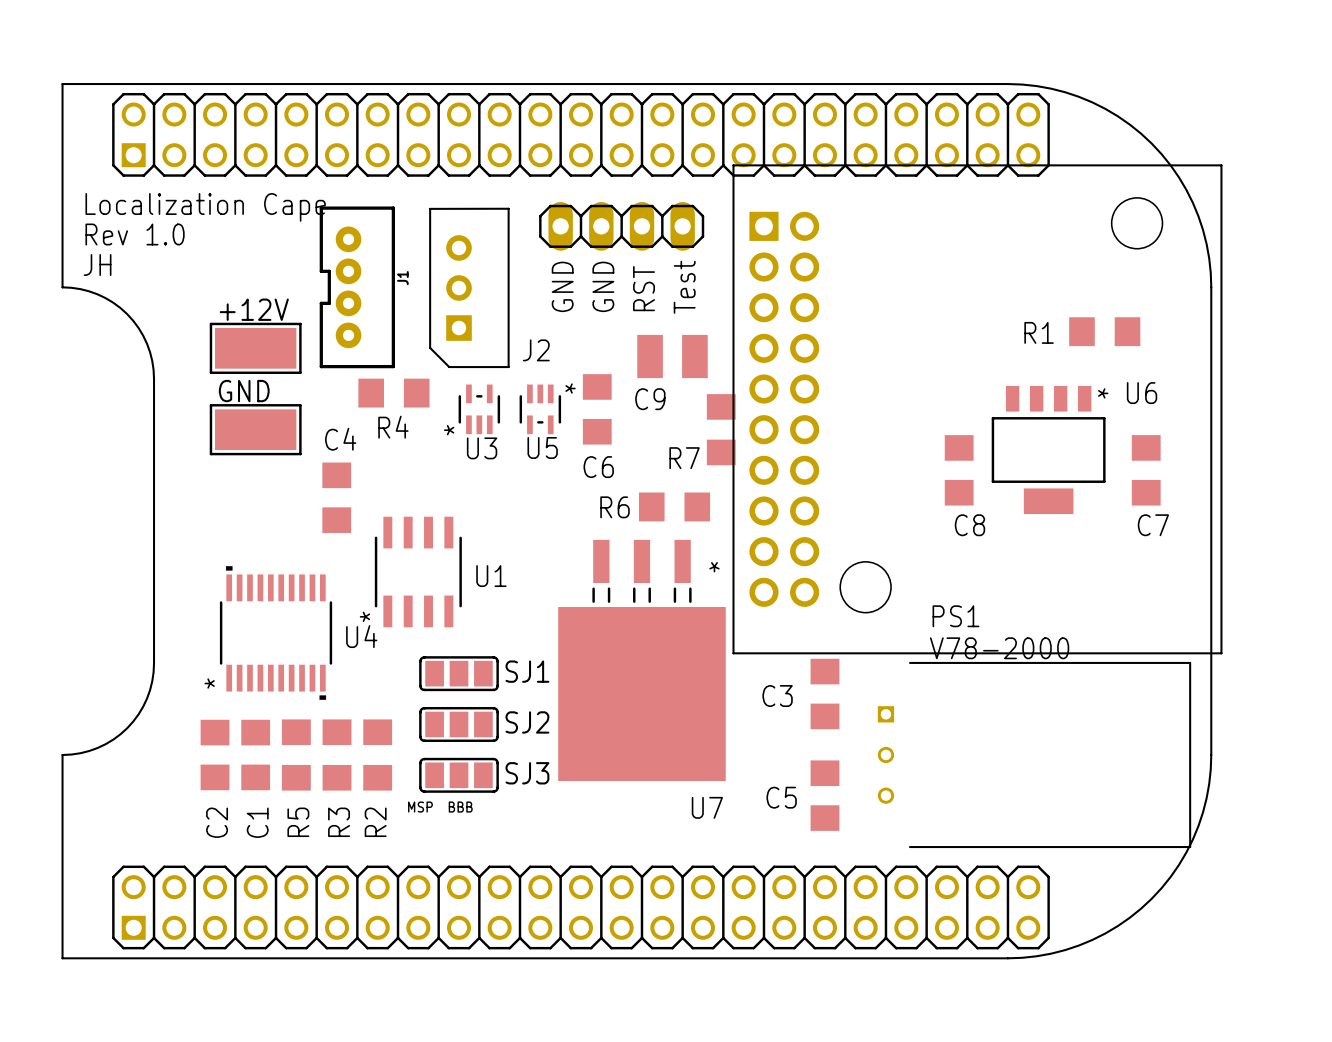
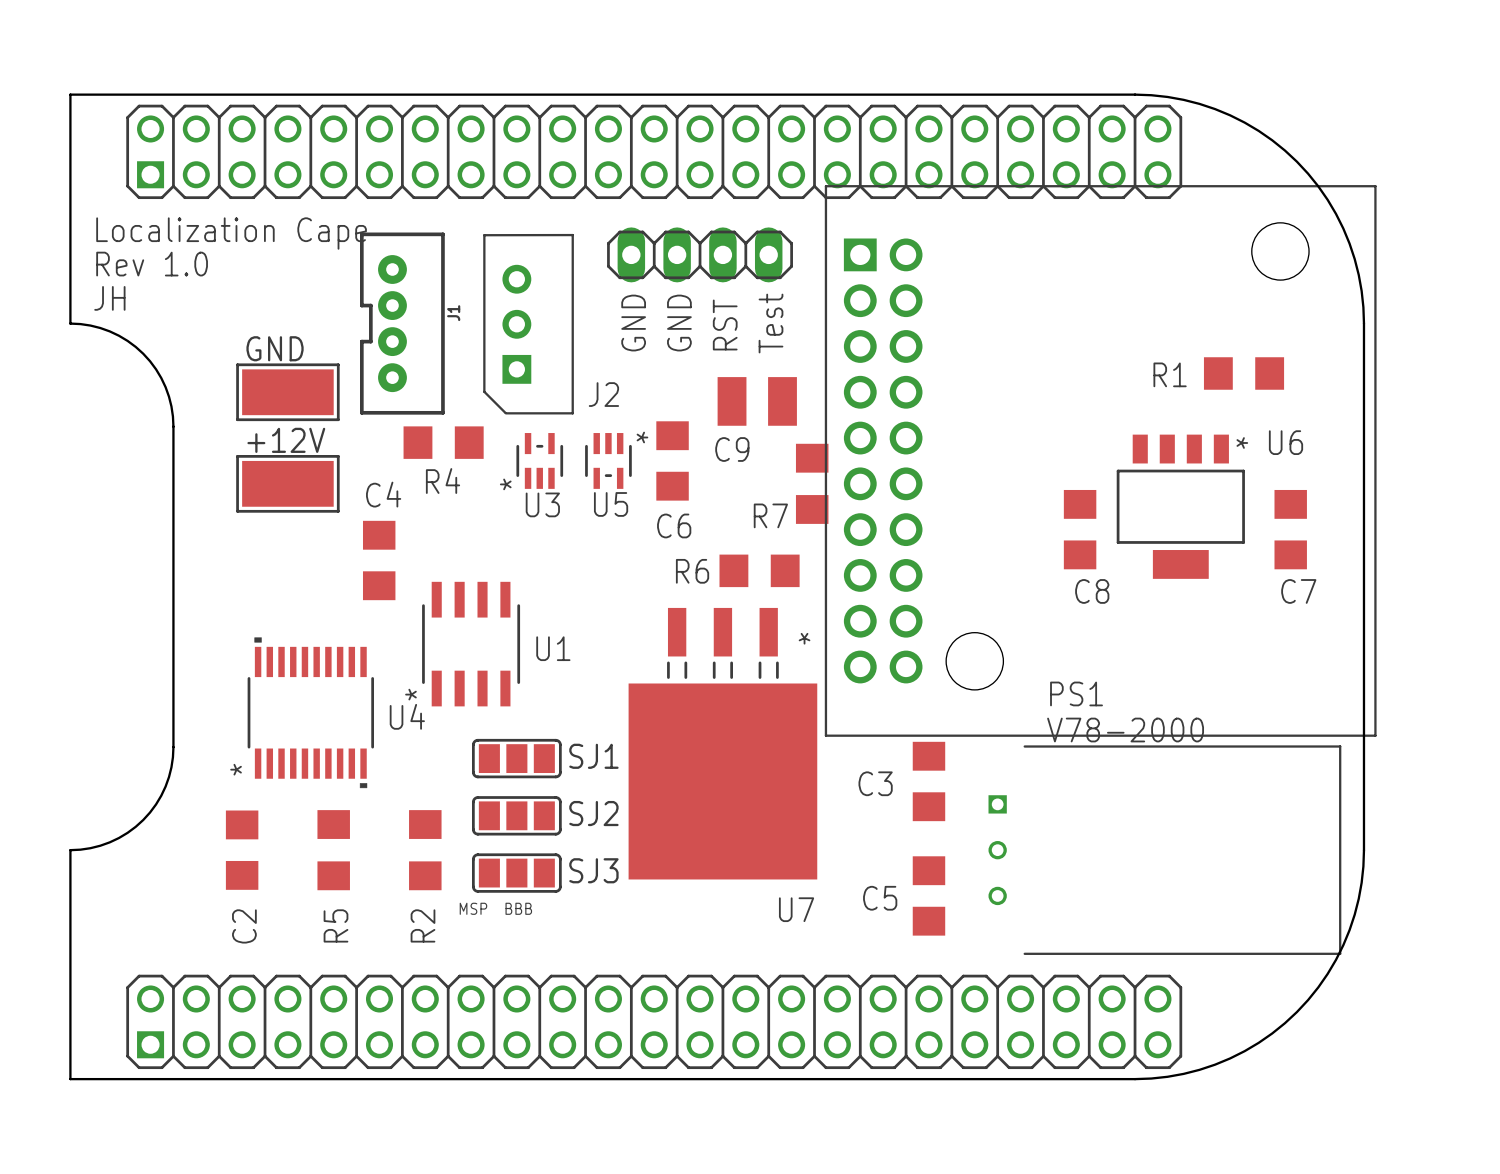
+12V name: +12V (254, 309) -> GND (275, 348)
GND name: GND (244, 391) -> +12V (286, 440)
C1: (255, 754) -> none
R3: (337, 754) -> none

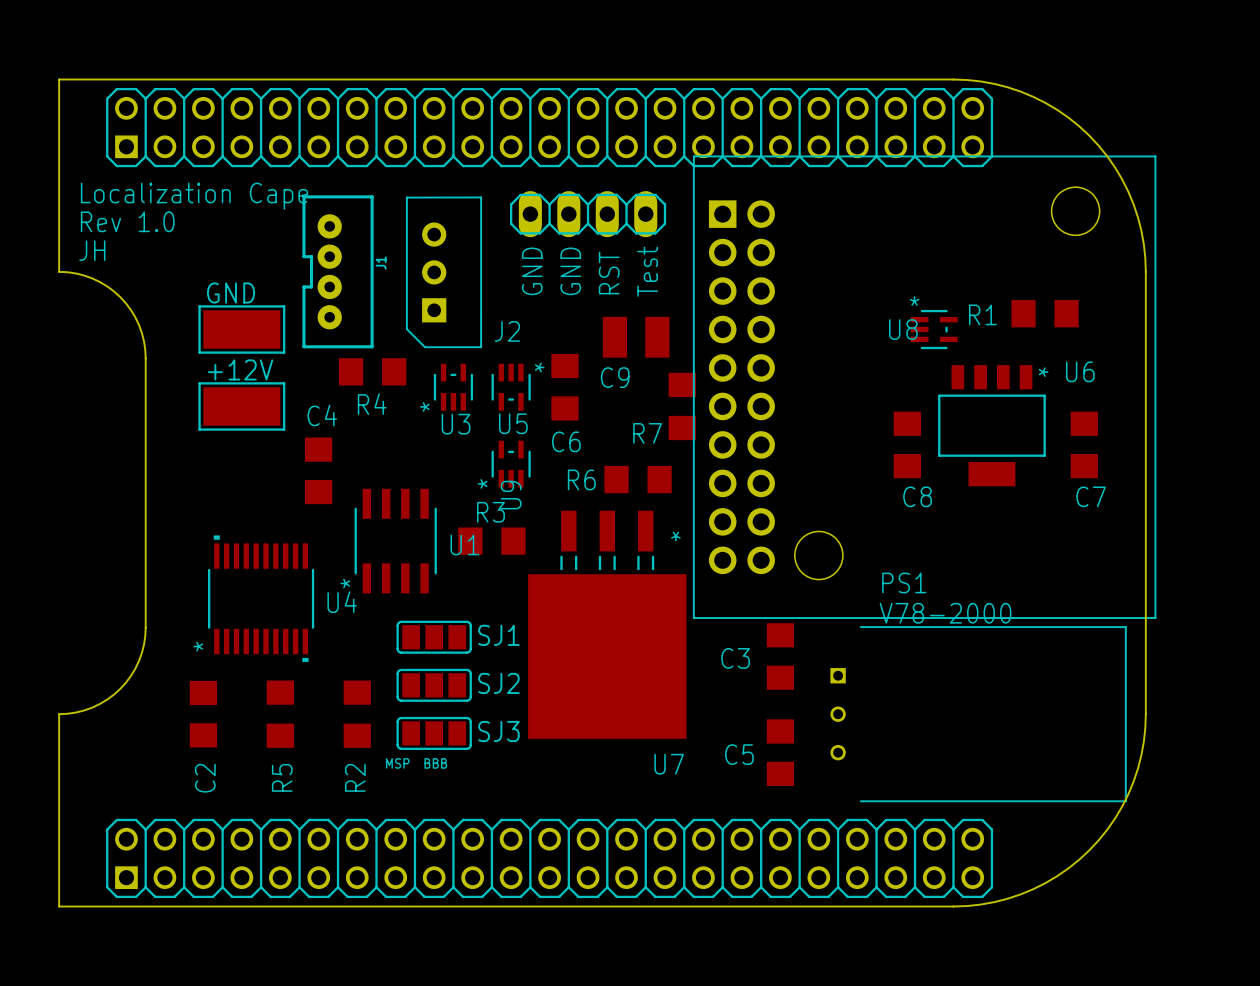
U8: none -> (934, 329)
U9: none -> (511, 464)
R3: none -> (491, 541)

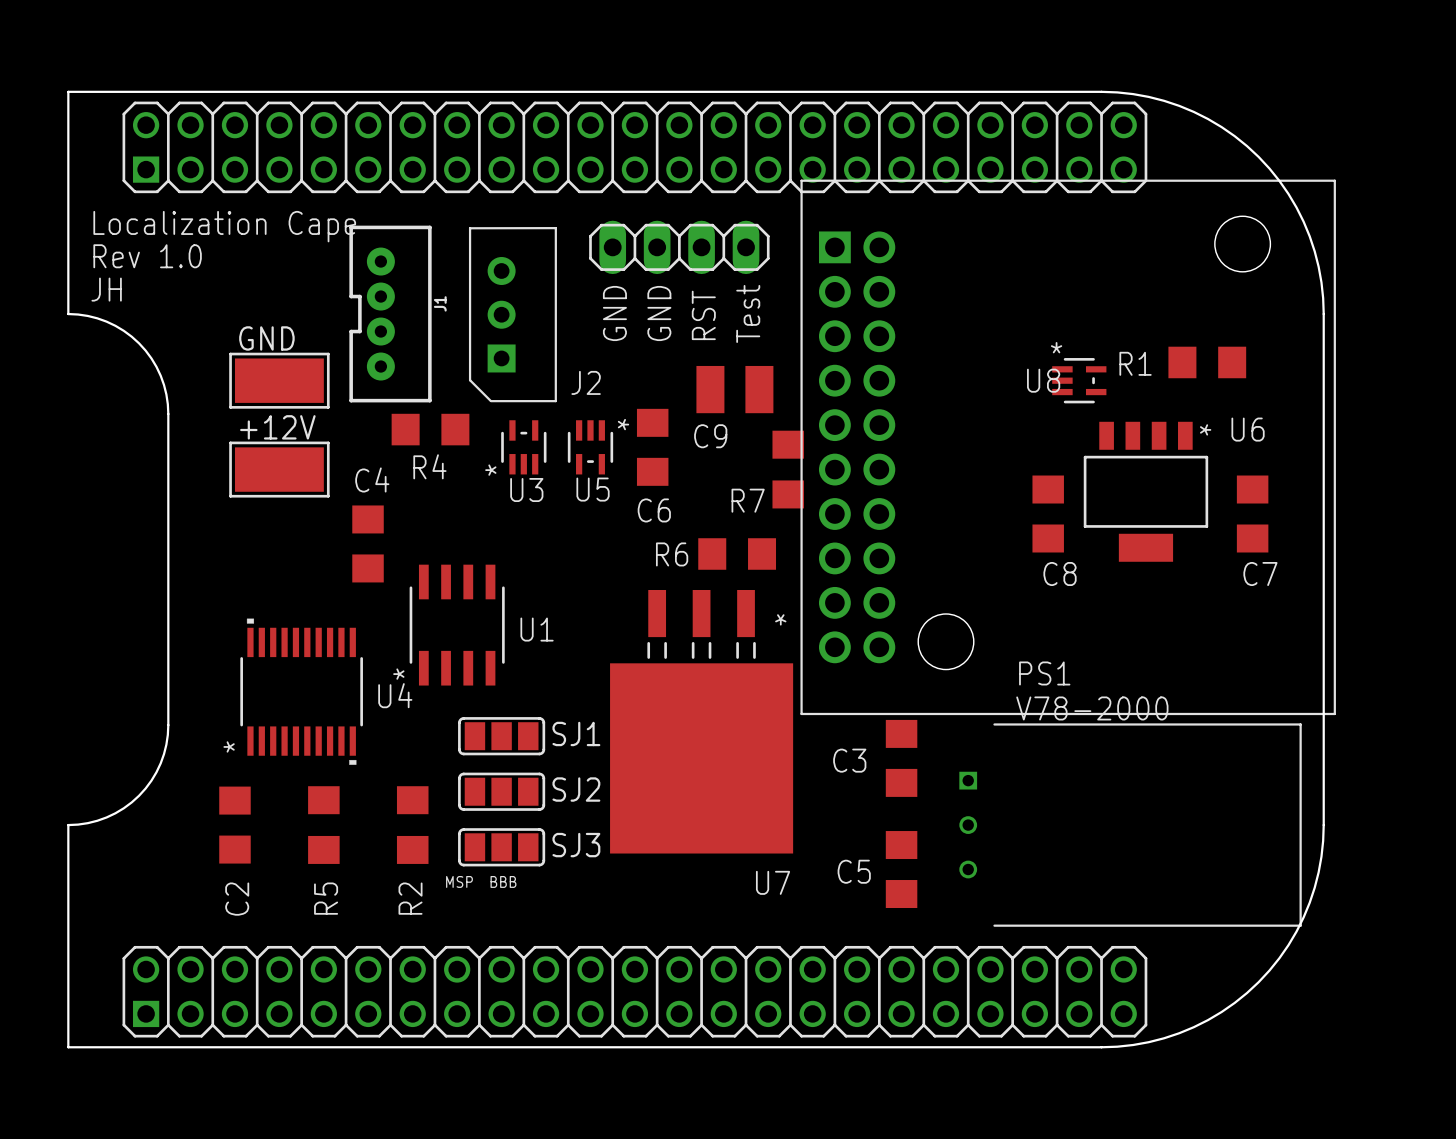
U9: (511, 464) -> none
R3: (491, 541) -> none

